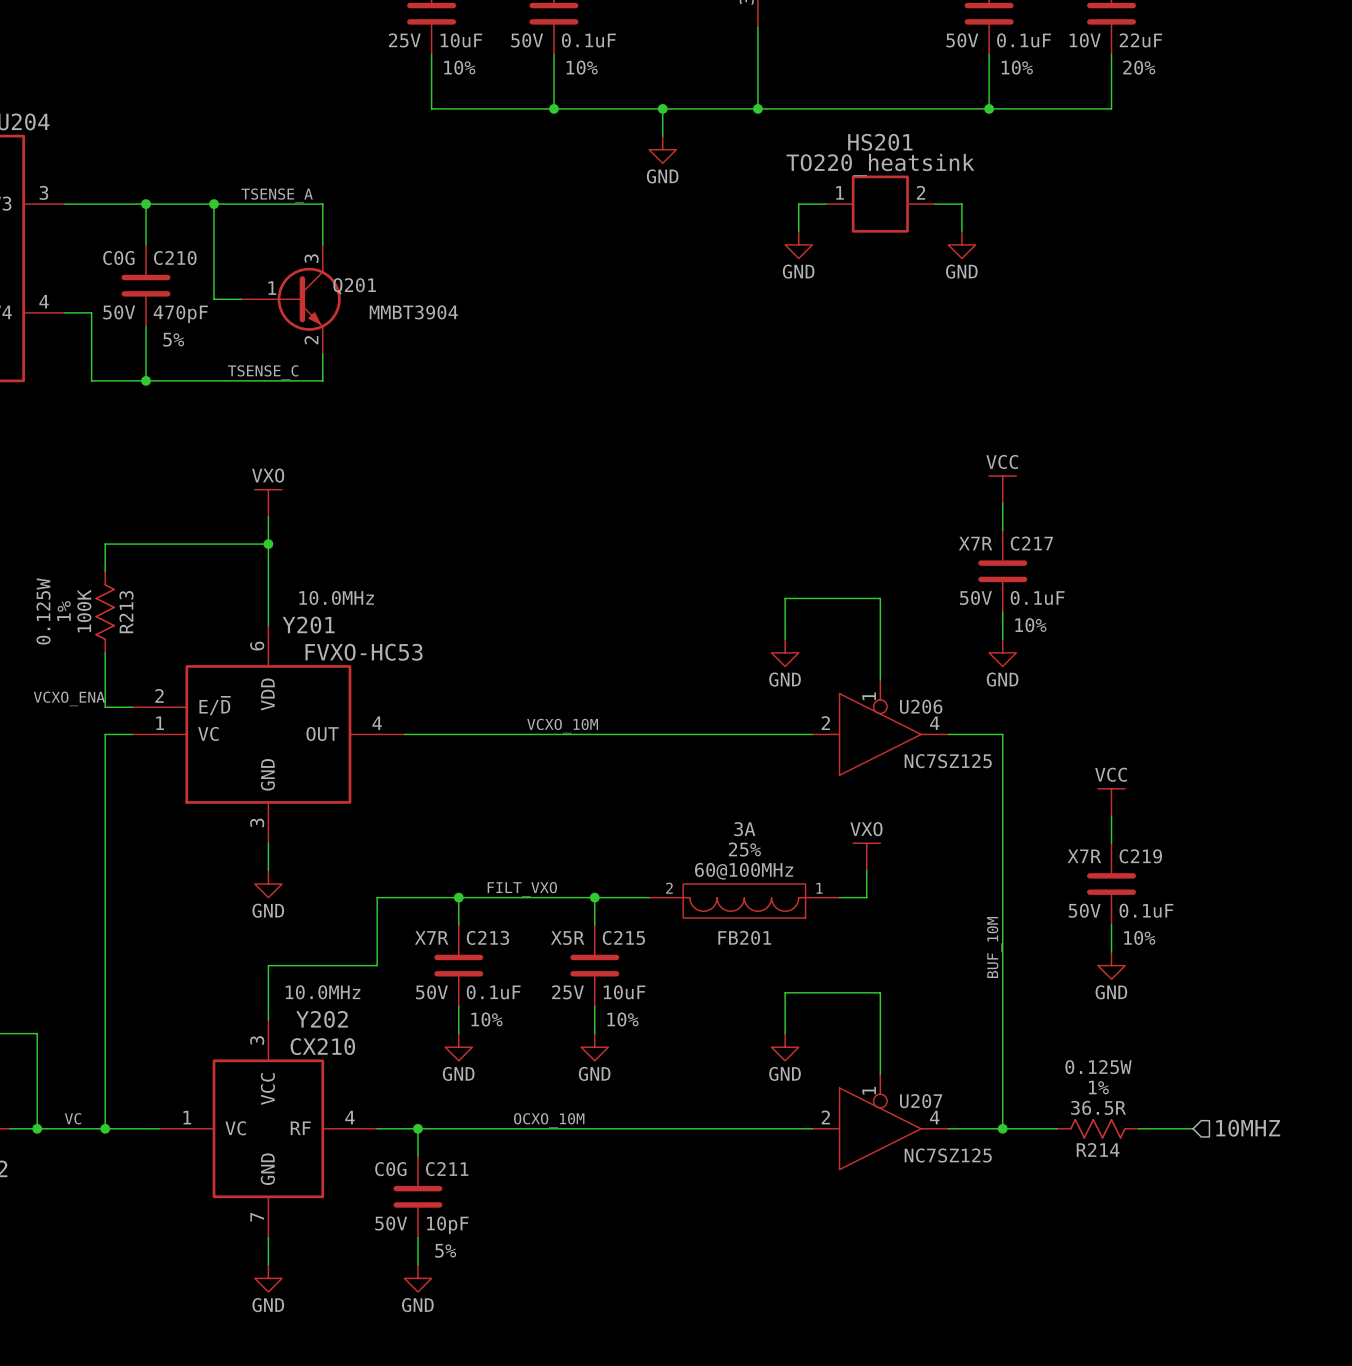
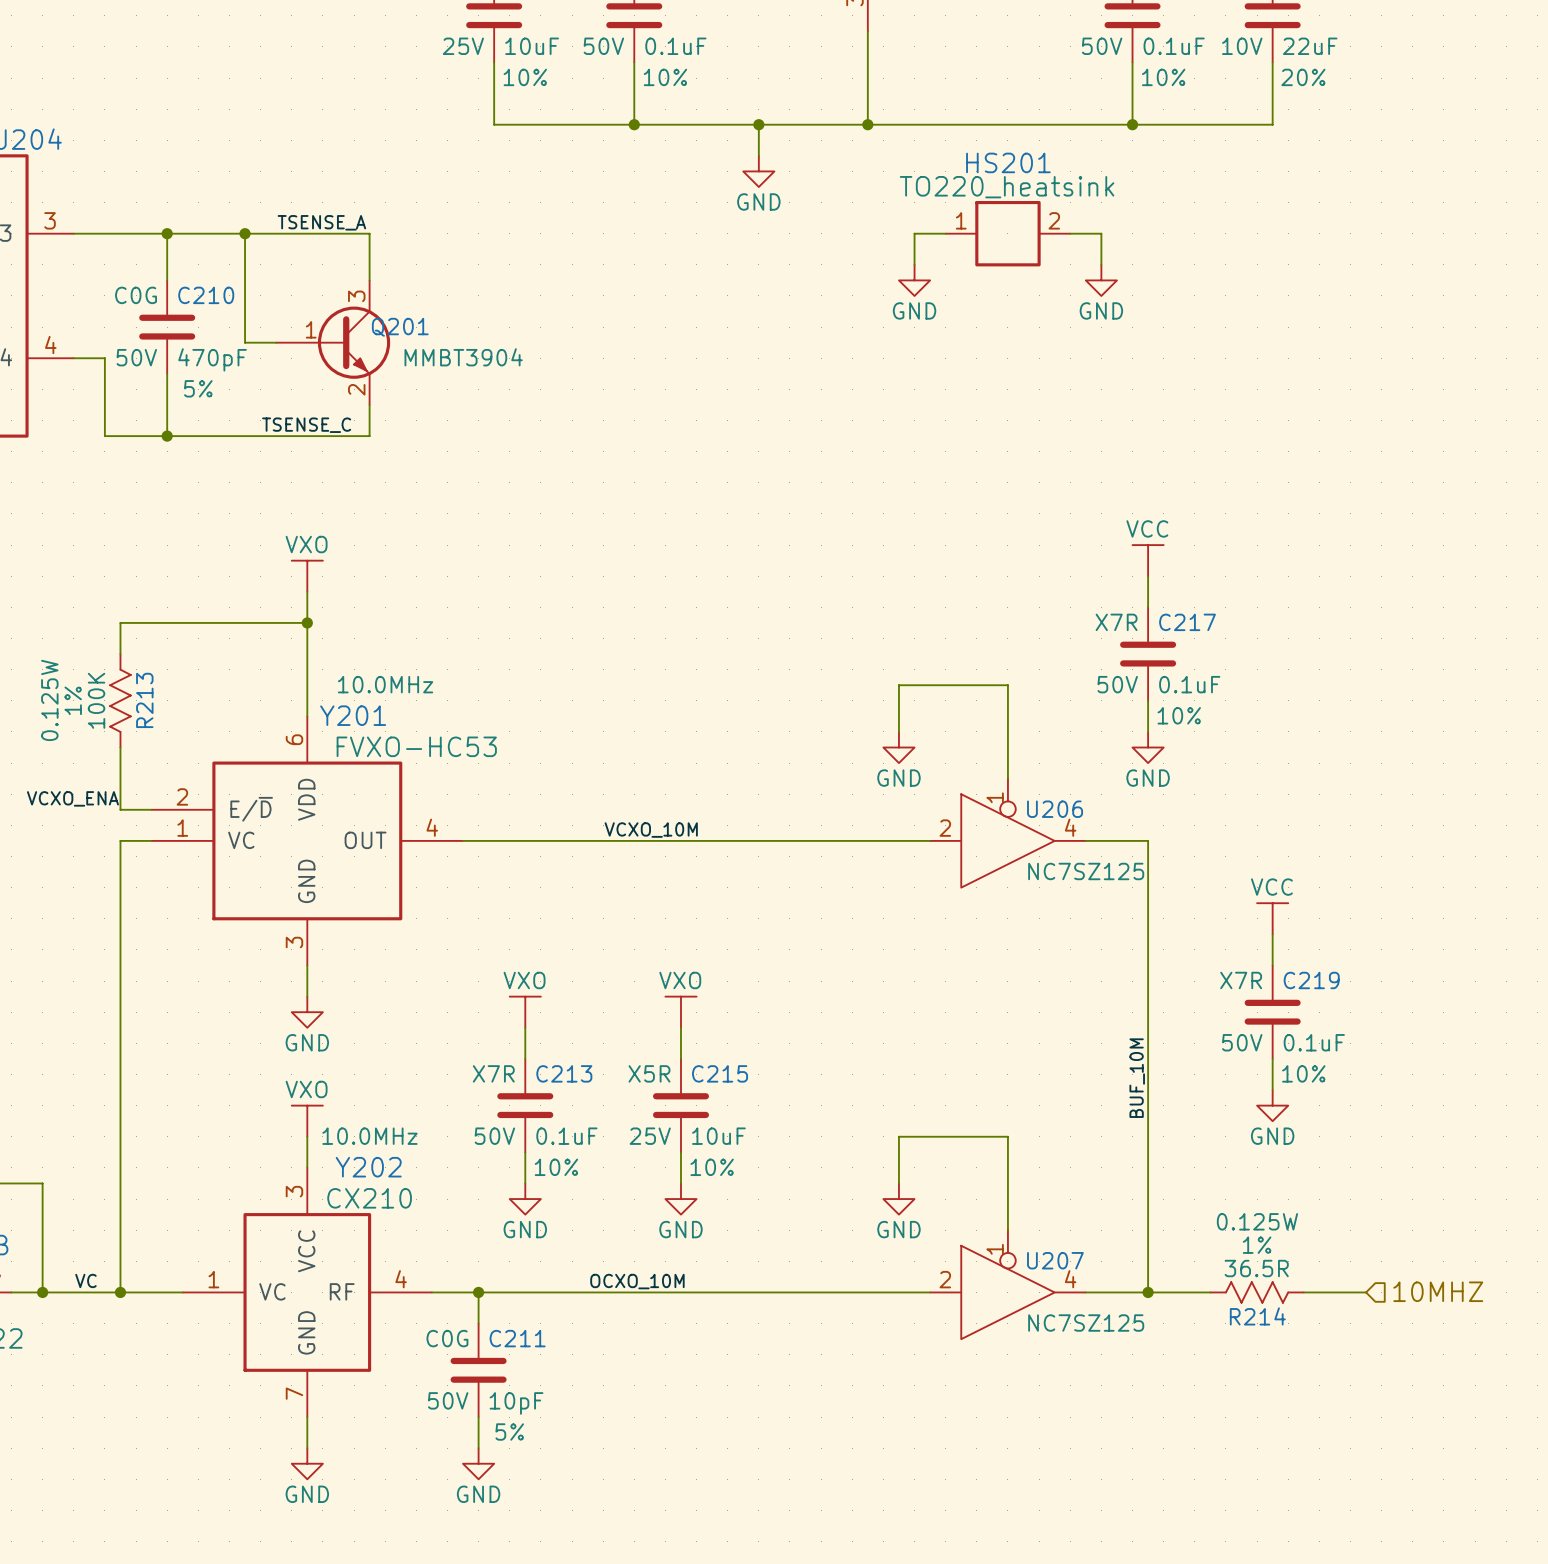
power symbol: VXO (866, 856) -> none
wire: (866, 870) (866, 897) (839, 897) -> none
power symbol: none -> VXO (525, 1012)
power symbol: none -> VXO (680, 1012)
label: FILT_VXO (522, 889) -> none
junction: (458, 897) -> none
junction: (594, 897) -> none
wire: (649, 897) (377, 897) (377, 965) (268, 965) (268, 992) -> none
FB201: 60@100MHz (744, 901) -> none
power symbol: none -> VXO (307, 1121)

